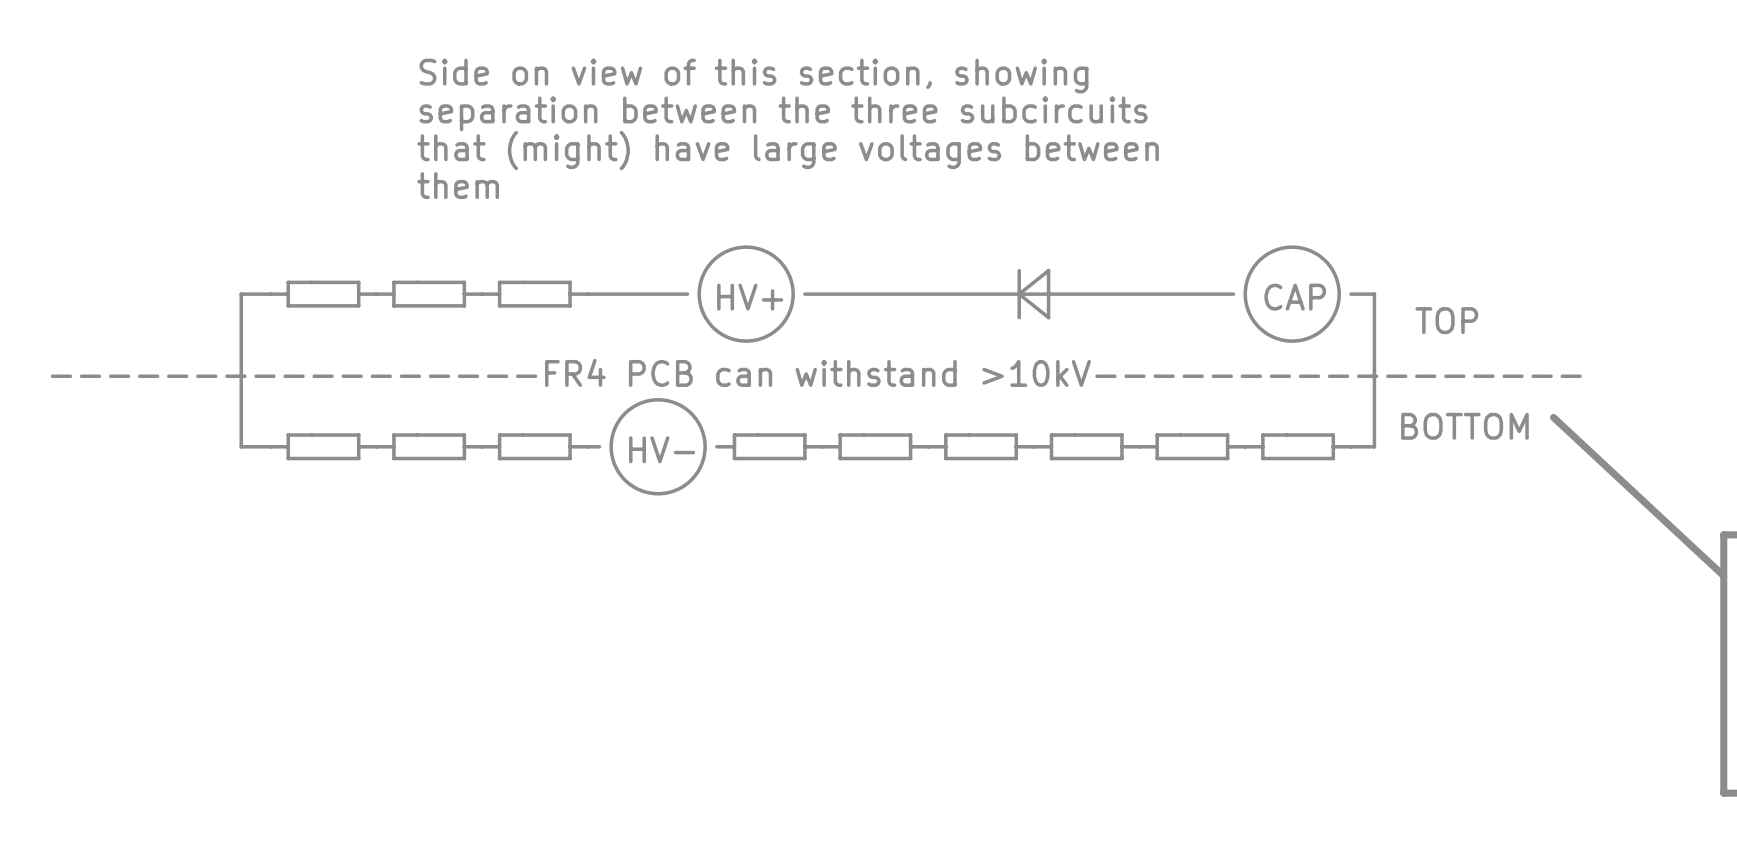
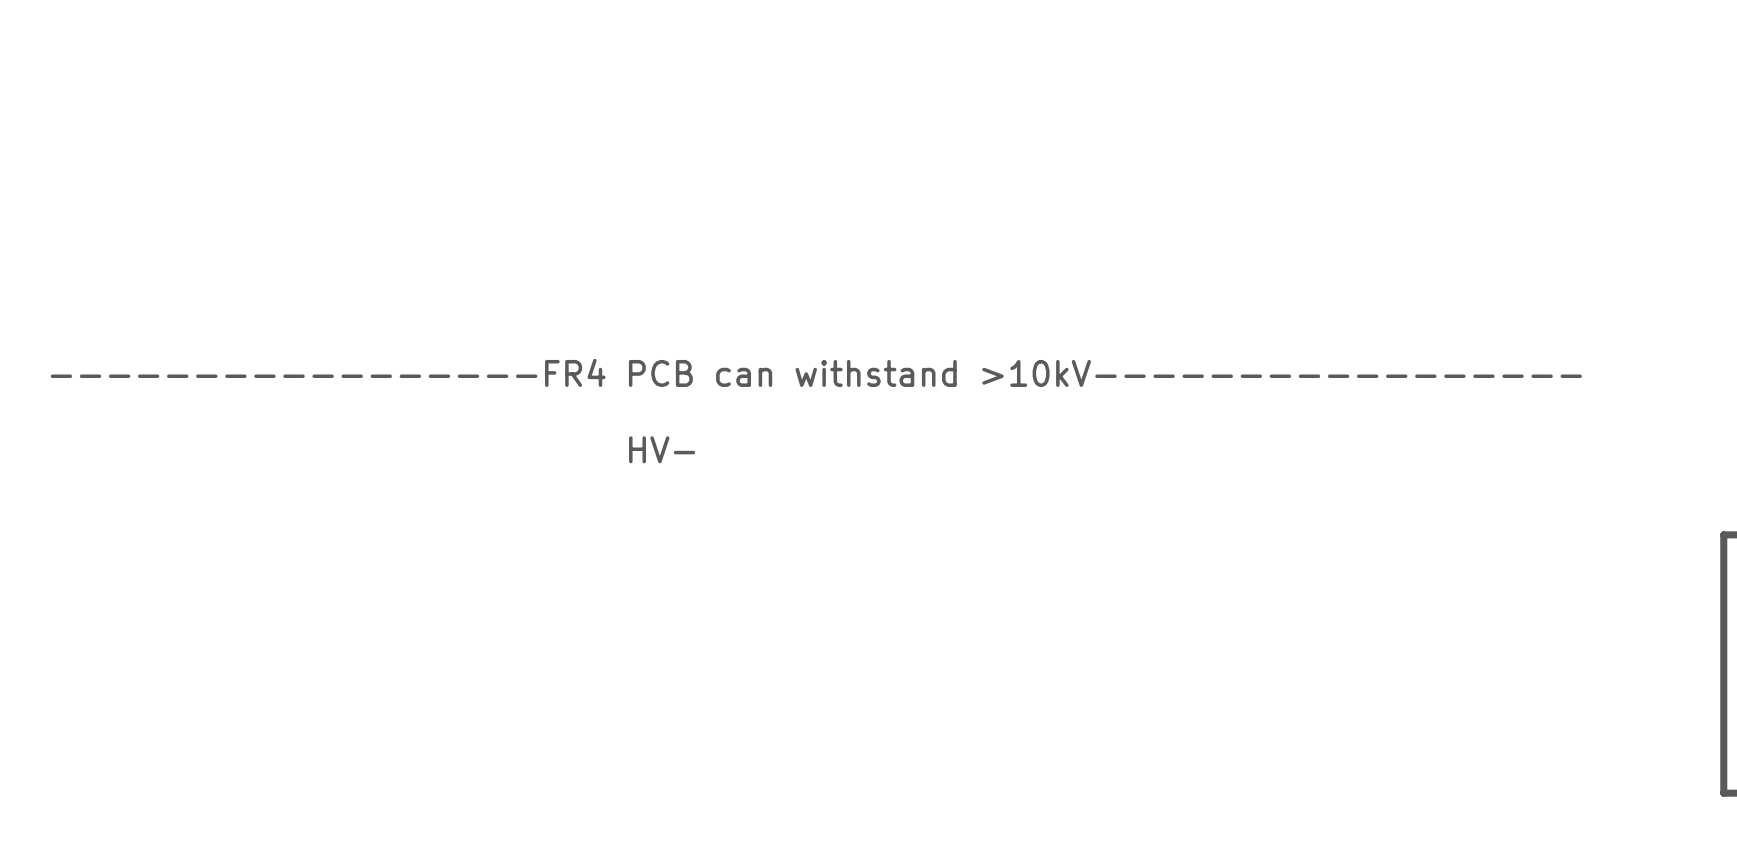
text: Side on view of this section, showing (753, 76) -> none
text: separation between the three subcircuits (783, 113) -> none
text: that (might) have large voltages between (788, 150) -> none
text: them (458, 185) -> none
drawing: [697, 245, 795, 343] -> none
drawing: [1243, 245, 1341, 343] -> none
line: (1019, 270) (1019, 317) -> none
line: (1048, 270) (1019, 294) (1048, 317) (1048, 270) -> none
line: (288, 282) (358, 282) (358, 305) (288, 305) (288, 282) -> none
line: (393, 282) (393, 305) (464, 305) (464, 282) (393, 282) -> none
line: (499, 282) (570, 282) (570, 305) (499, 305) (499, 282) -> none
line: (288, 294) (241, 294) (241, 446) (288, 446) -> none
line: (358, 294) (393, 294) -> none
line: (464, 294) (499, 294) -> none
line: (570, 294) (687, 294) -> none
line: (804, 294) (1233, 294) -> none
line: (1350, 294) (1374, 294) (1374, 446) (1333, 446) -> none
text: HV+ (750, 297) -> none
text: CAP (1295, 297) -> none
text: TOP (1446, 320) -> none
drawing: [609, 398, 707, 496] -> none
line: (1553, 417) (1723, 575) -> none
text: BOTTOM (1464, 426) -> none
line: (288, 435) (358, 435) (358, 458) (288, 458) (288, 435) -> none
line: (393, 435) (393, 458) (464, 458) (464, 435) (393, 435) -> none
line: (499, 435) (570, 435) (570, 458) (499, 458) (499, 435) -> none
line: (734, 435) (804, 435) (804, 458) (734, 458) (734, 435) -> none
line: (840, 435) (910, 435) (910, 458) (840, 458) (840, 435) -> none
line: (945, 435) (1016, 435) (1016, 458) (945, 458) (945, 435) -> none
line: (1051, 435) (1121, 435) (1121, 458) (1051, 458) (1051, 435) -> none
line: (1157, 435) (1227, 435) (1227, 458) (1157, 458) (1157, 435) -> none
line: (1262, 435) (1333, 435) (1333, 458) (1262, 458) (1262, 435) -> none
line: (358, 446) (393, 446) -> none
line: (464, 446) (499, 446) -> none
line: (570, 446) (599, 446) -> none
line: (716, 446) (734, 446) -> none
line: (804, 446) (840, 446) -> none
line: (910, 446) (945, 446) -> none
line: (1016, 446) (1051, 446) -> none
line: (1121, 446) (1157, 446) -> none
line: (1227, 446) (1262, 446) -> none

